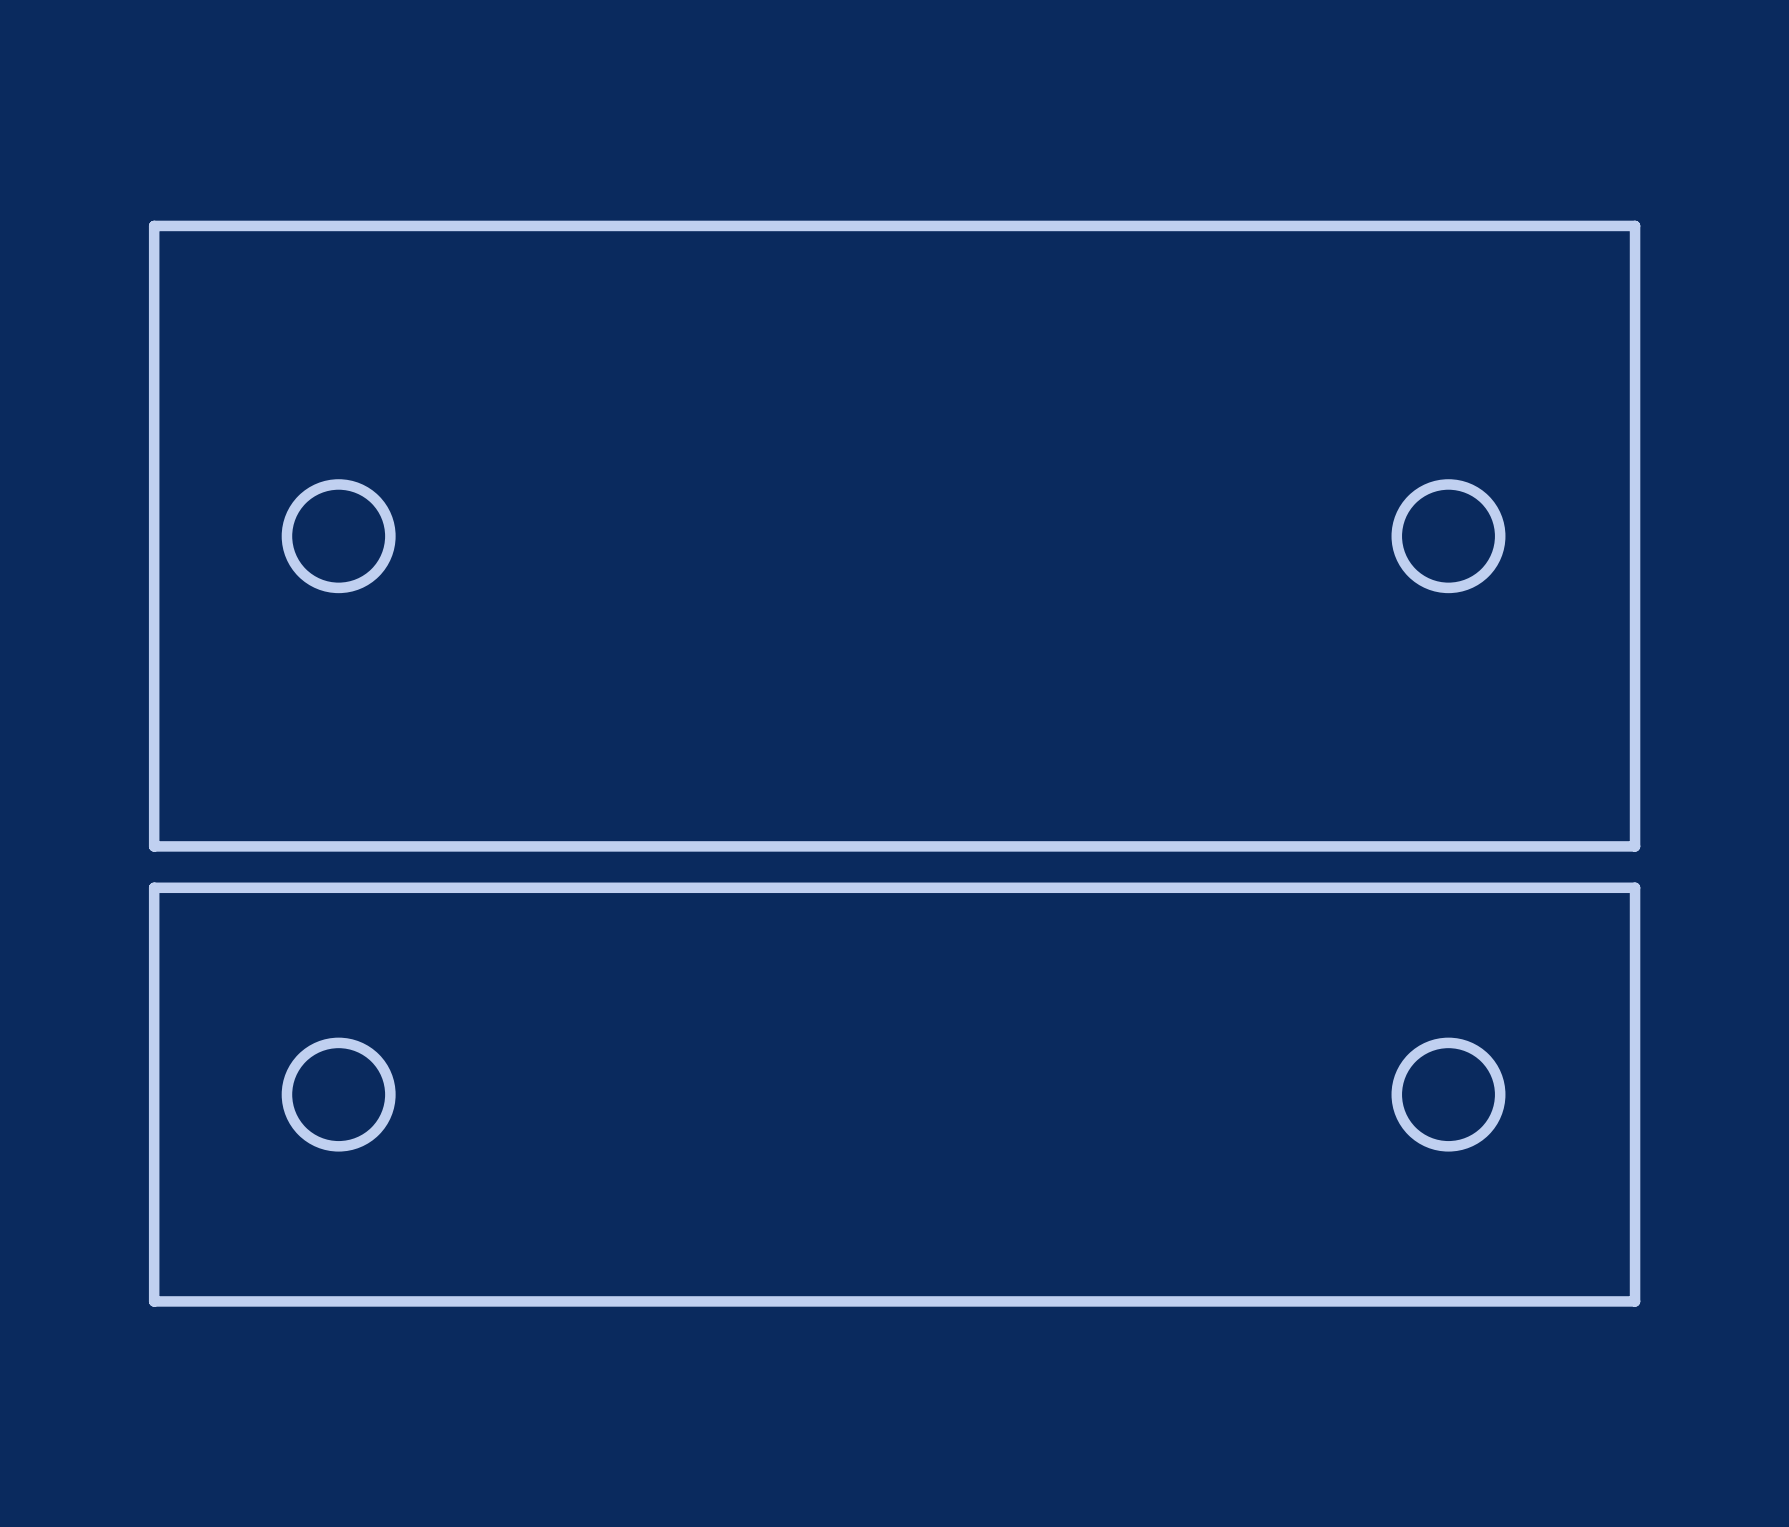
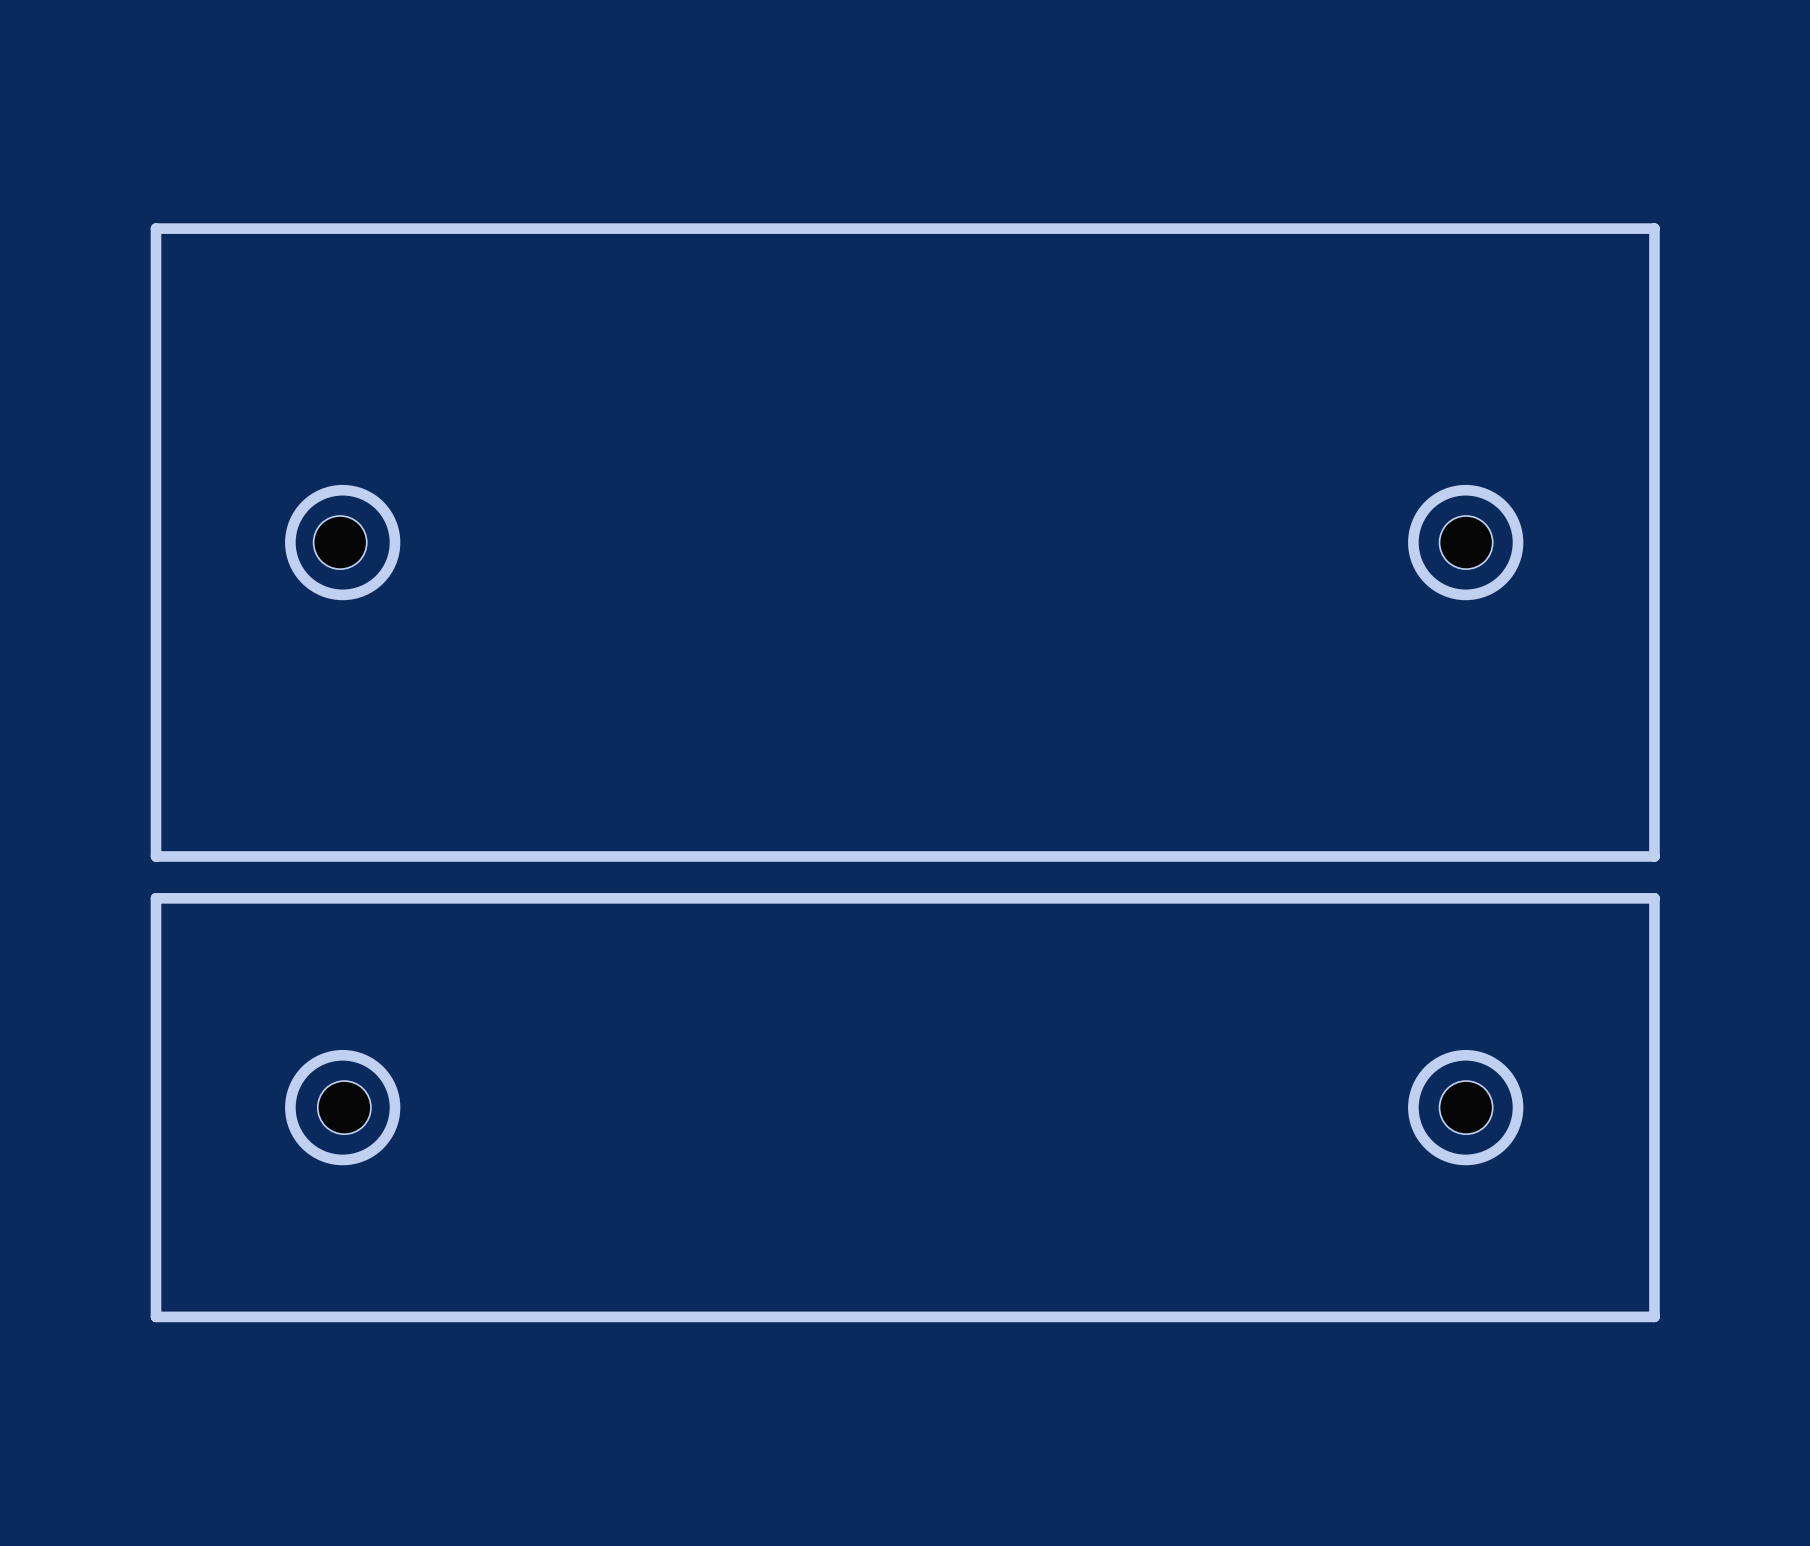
hole: none -> (340, 542)
hole: none -> (1466, 542)
hole: none -> (344, 1107)
hole: none -> (1466, 1107)

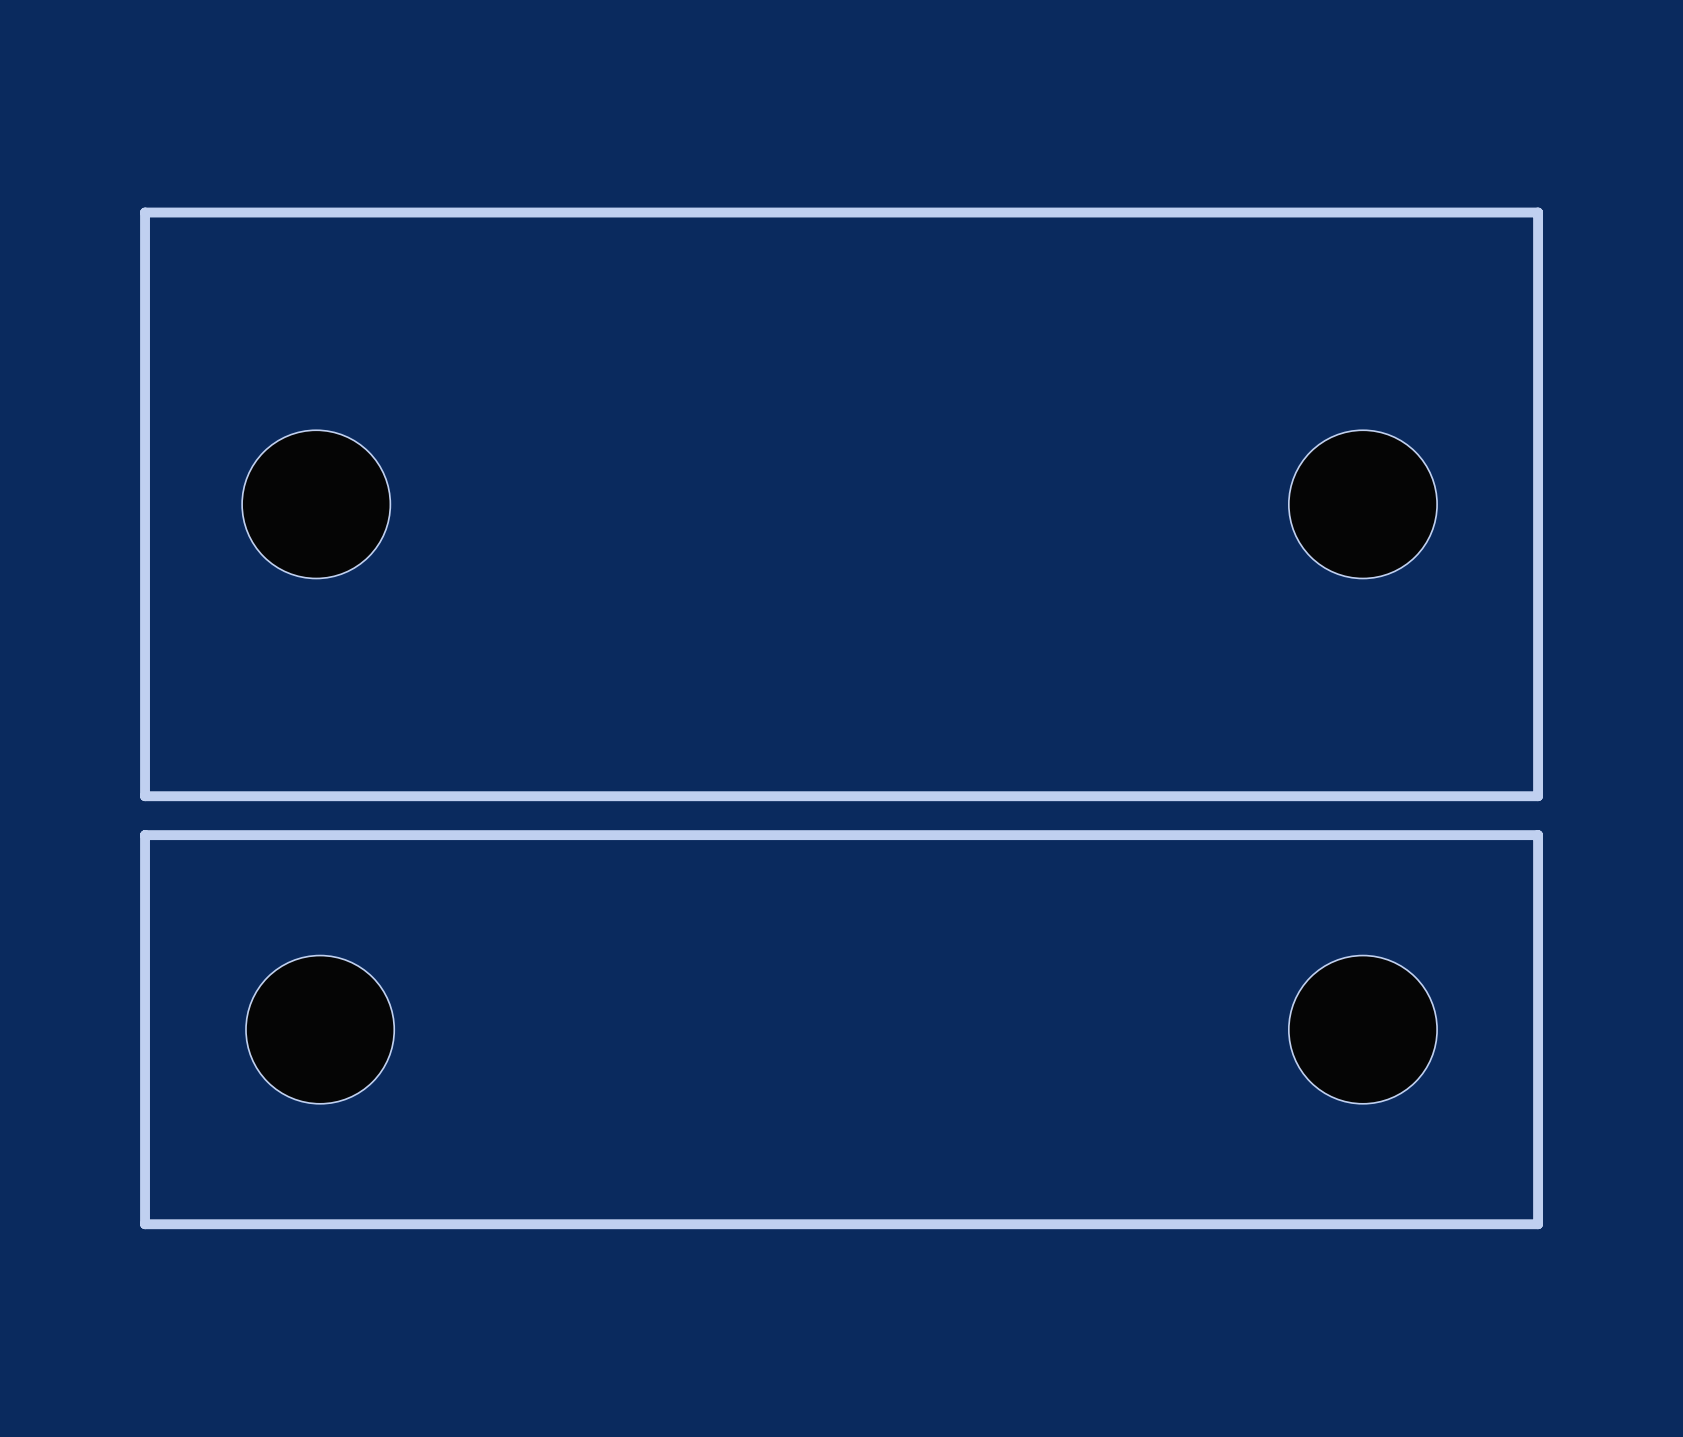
round board edge: [285, 484, 401, 601] -> none
round board edge: [1408, 484, 1524, 601] -> none
hole size: [313, 515, 367, 570] -> [242, 430, 391, 579]
hole size: [1439, 515, 1493, 570] -> [1288, 430, 1438, 579]
round board edge: [285, 1049, 401, 1166] -> none
round board edge: [1408, 1049, 1524, 1166] -> none
hole size: [317, 1081, 371, 1135] -> [246, 955, 395, 1104]
hole size: [1439, 1081, 1493, 1135] -> [1288, 955, 1438, 1104]

